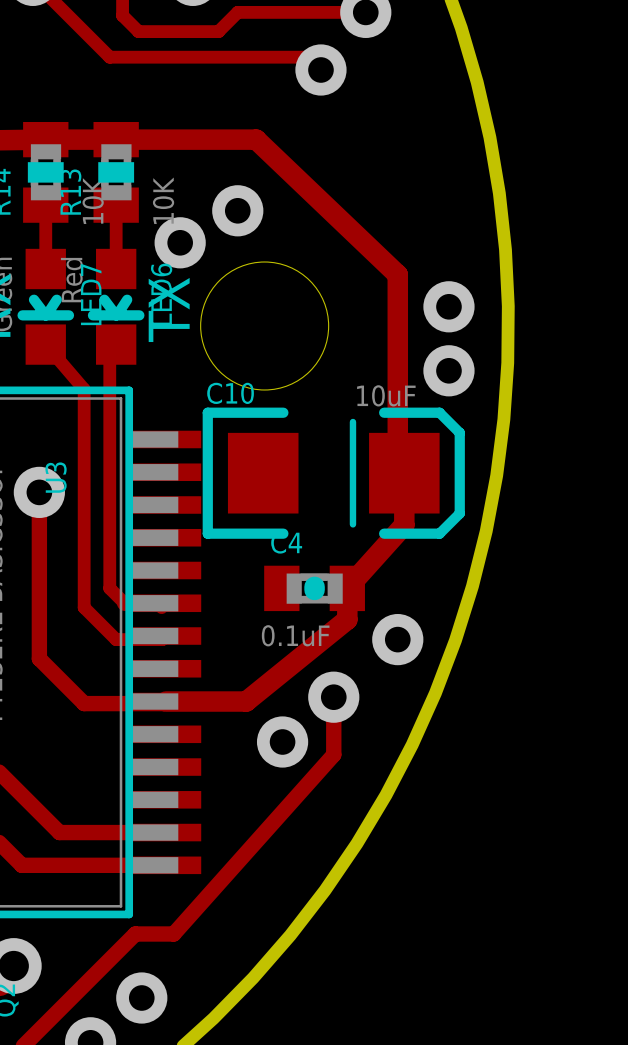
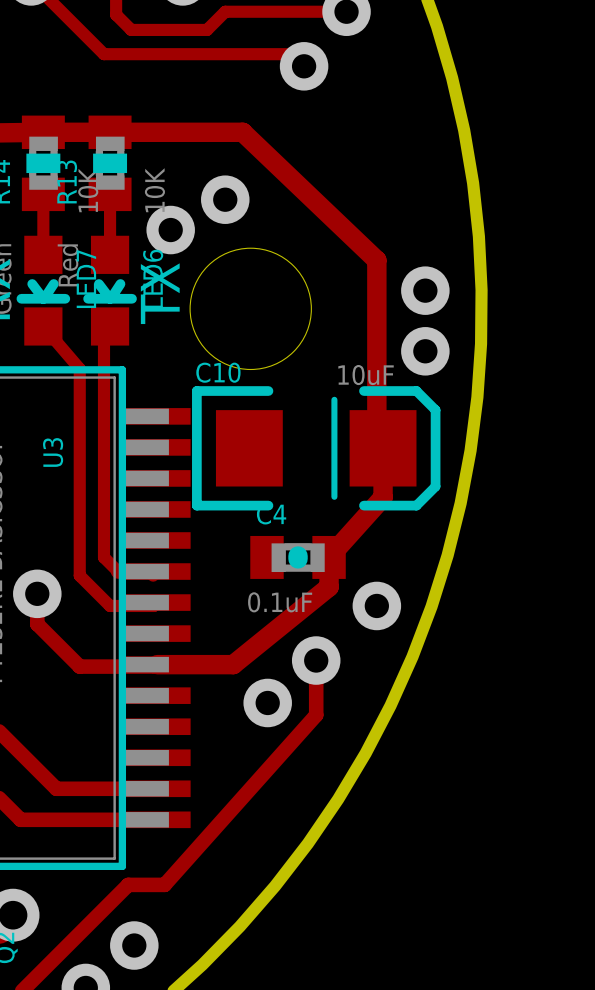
track: (39, 492) (39, 626) -> none
via position: (39, 492) -> (37, 593)

